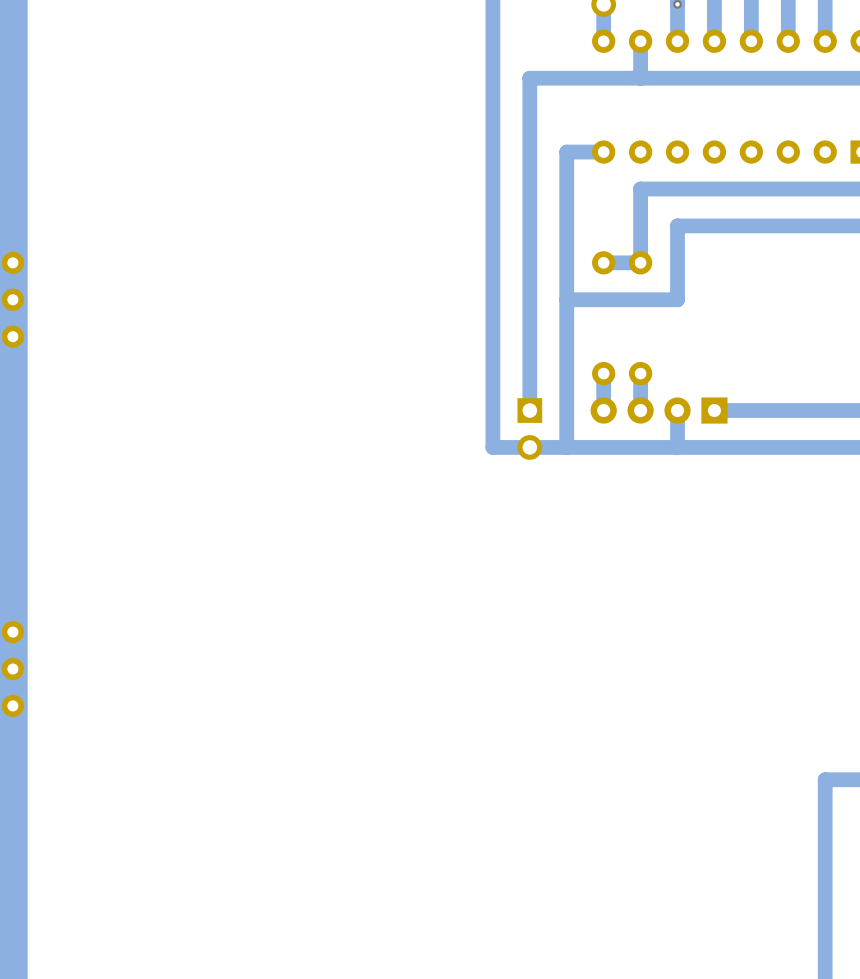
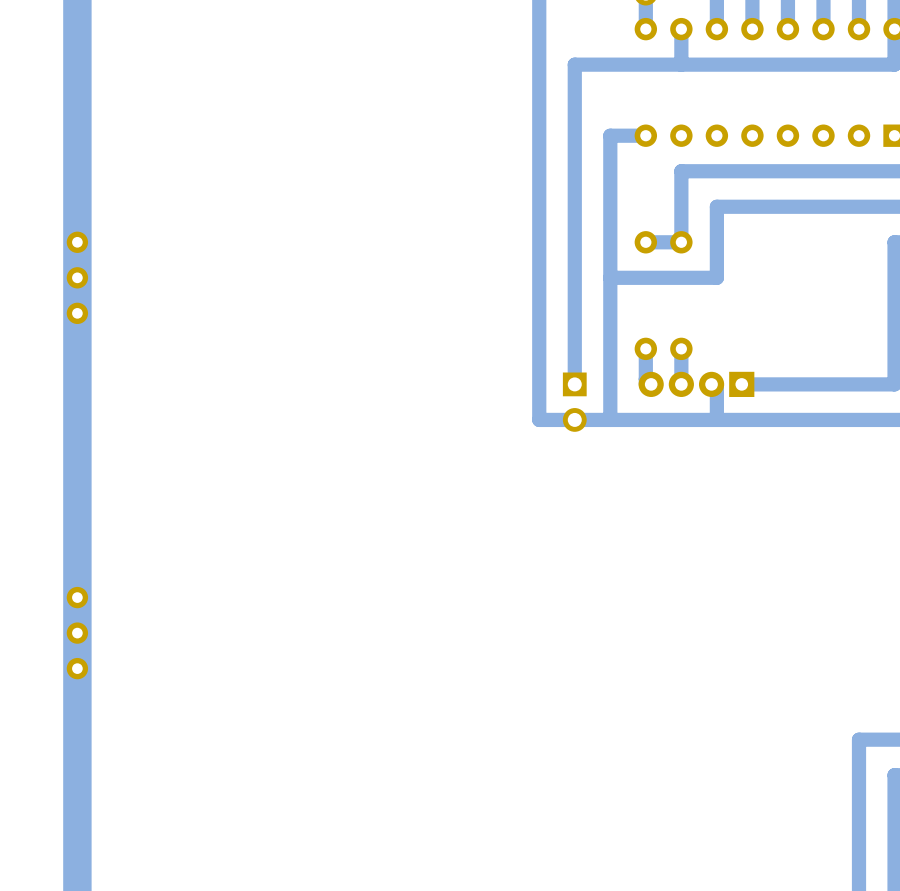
part footprint: [590, 397, 728, 424] -> [638, 371, 755, 397]

